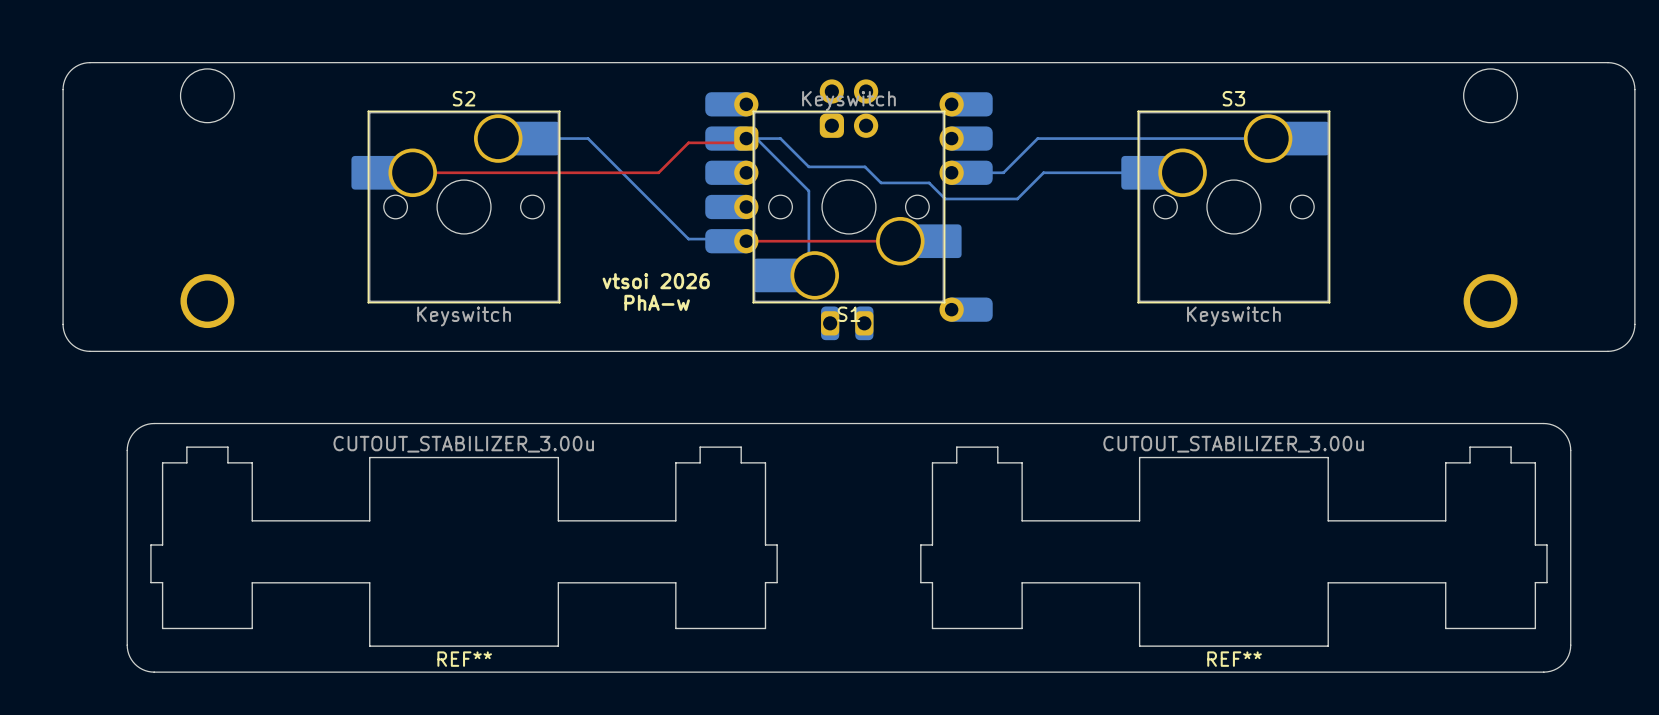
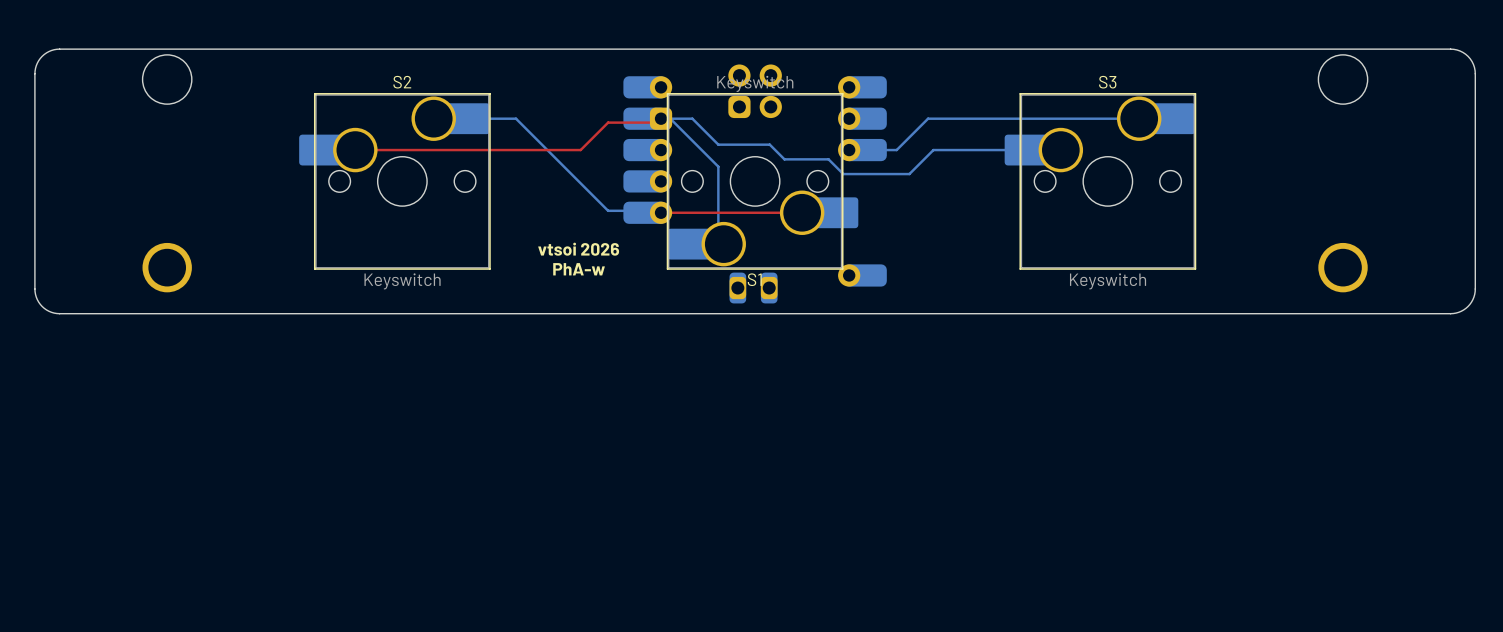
board edge: (154, 423) (1546, 423) (1555, 426) (1562, 431) (1568, 438) (1570, 447) (1570, 648) (1567, 658) (1560, 666) (1543, 672) (151, 671) (142, 669) (135, 664) (129, 656) (127, 648) (127, 450) (128, 441) (135, 431) (145, 425) (154, 423) -> none
REF**: CUTOUT_STABILIZER_3.00u (464, 546) -> none
REF**: CUTOUT_STABILIZER_3.00u (1233, 546) -> none

